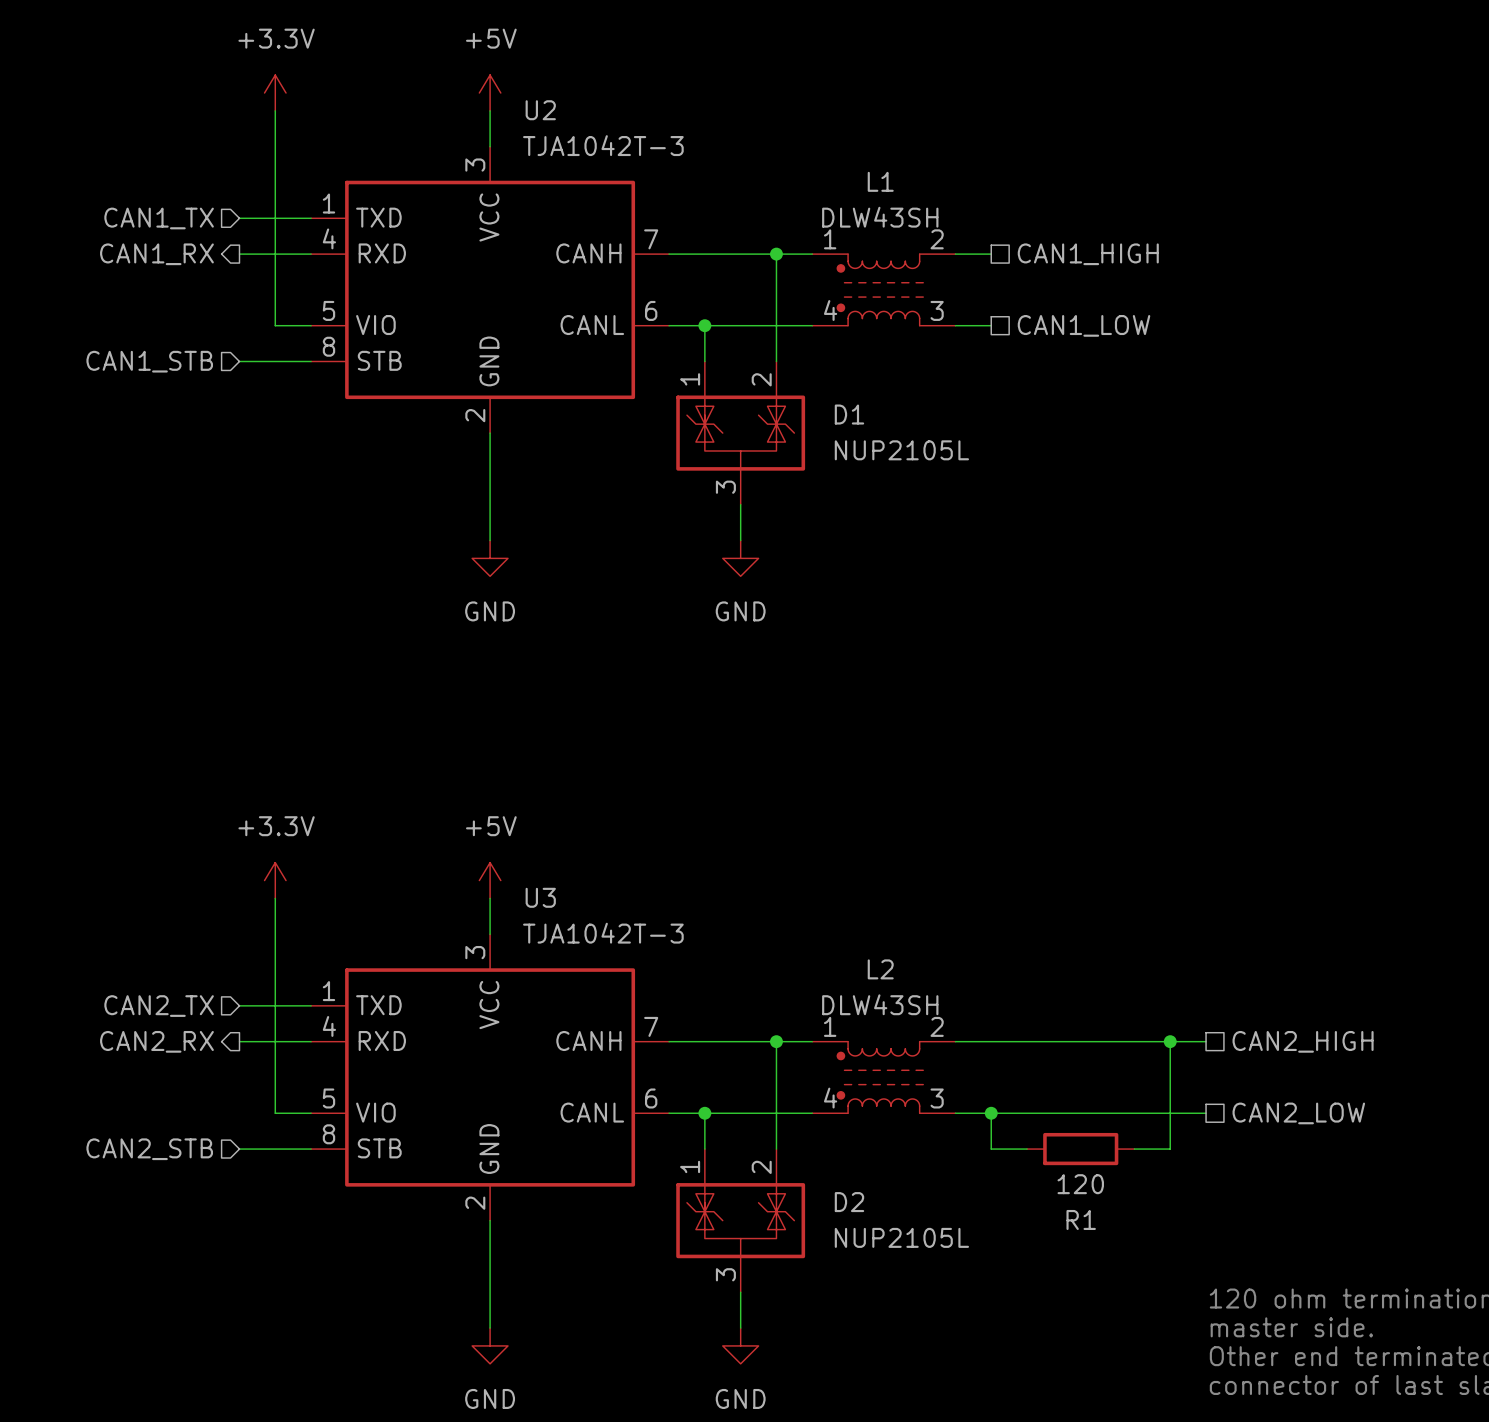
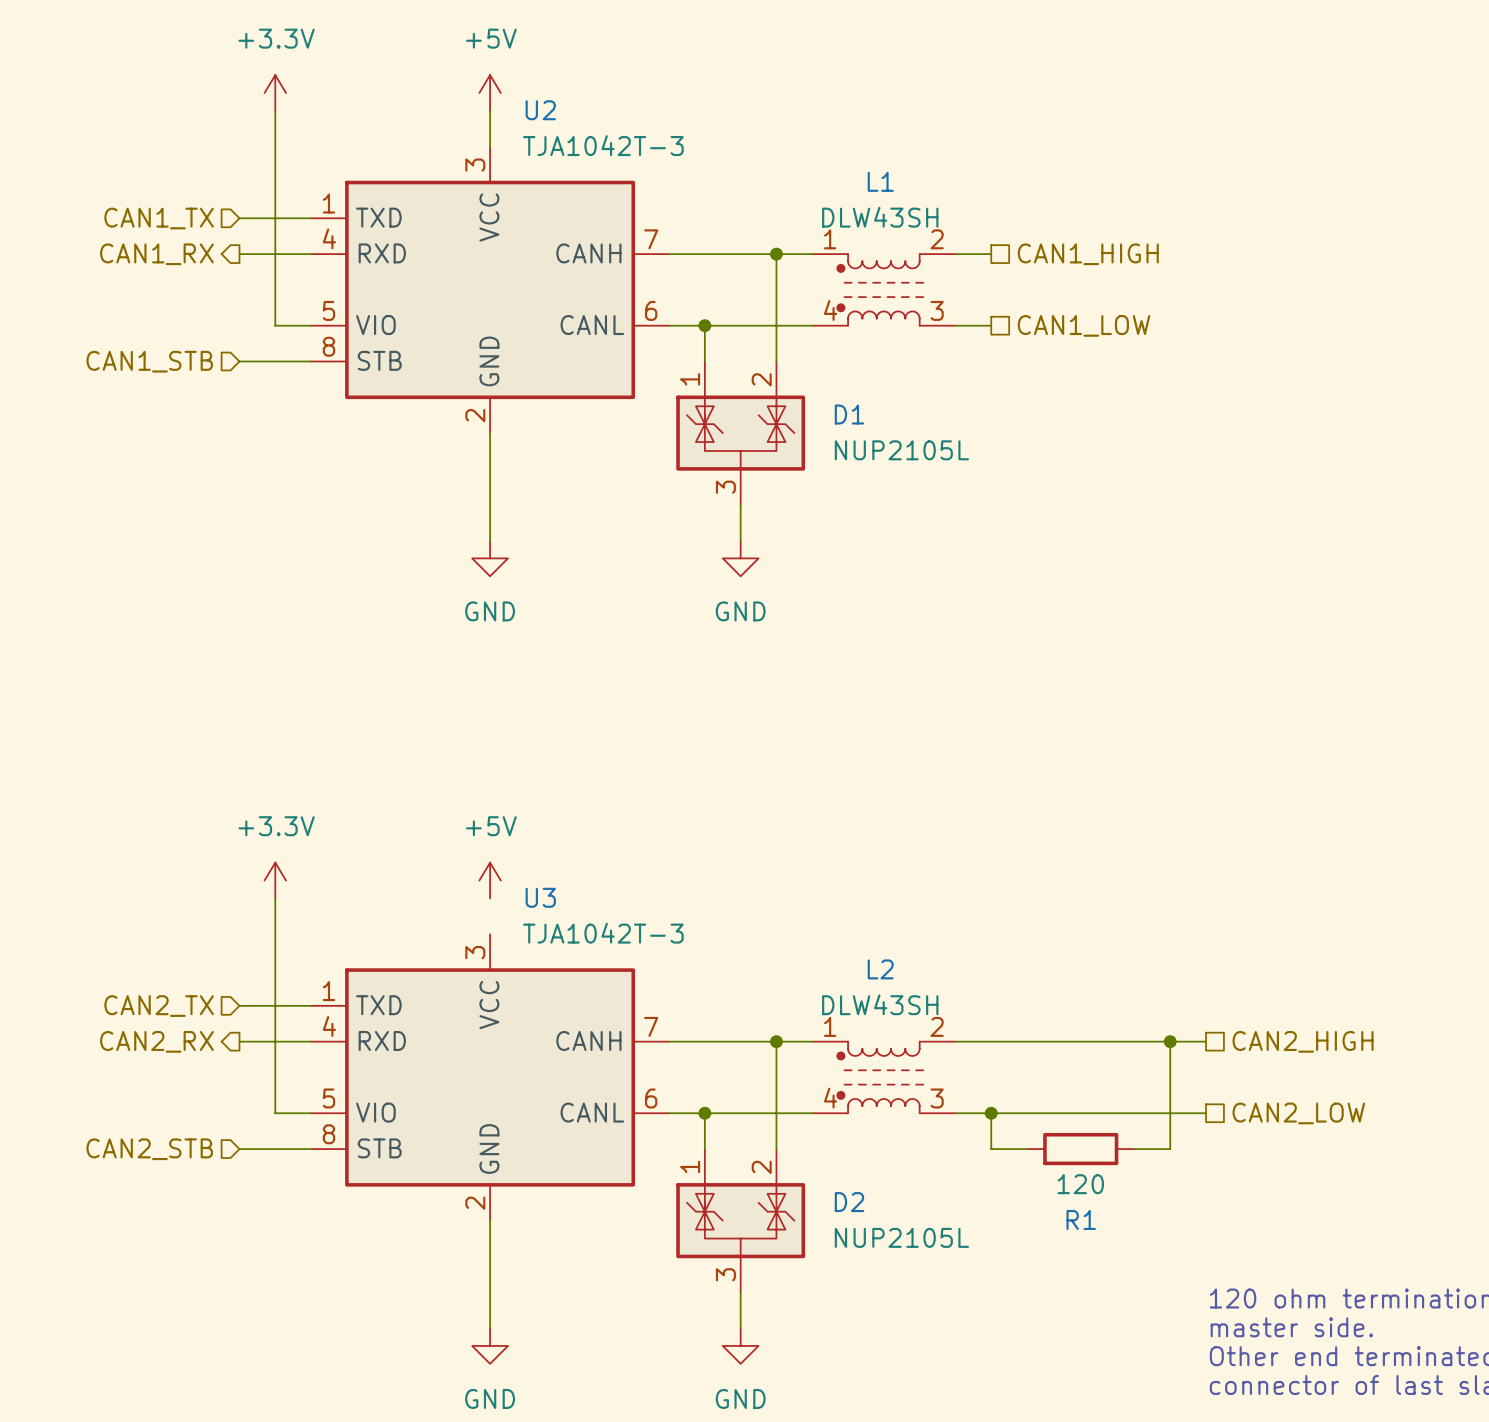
wire: (490, 898) (490, 934) -> none

